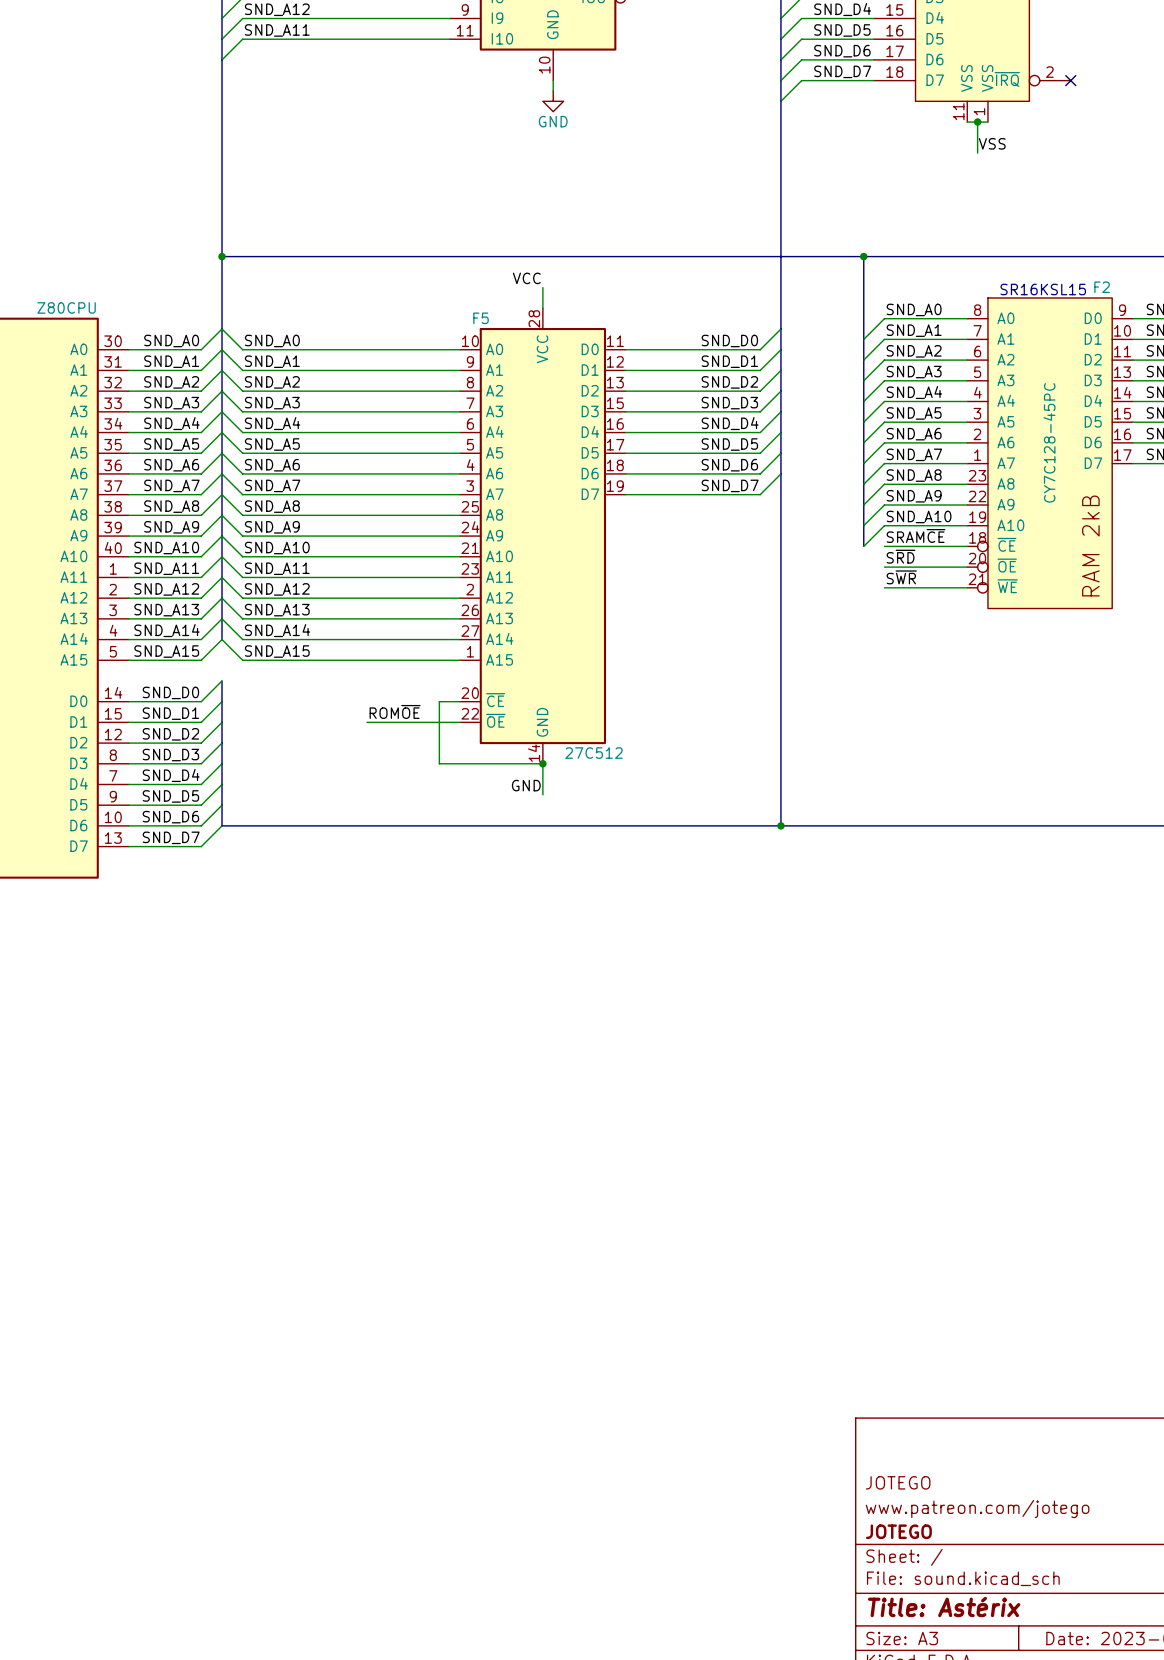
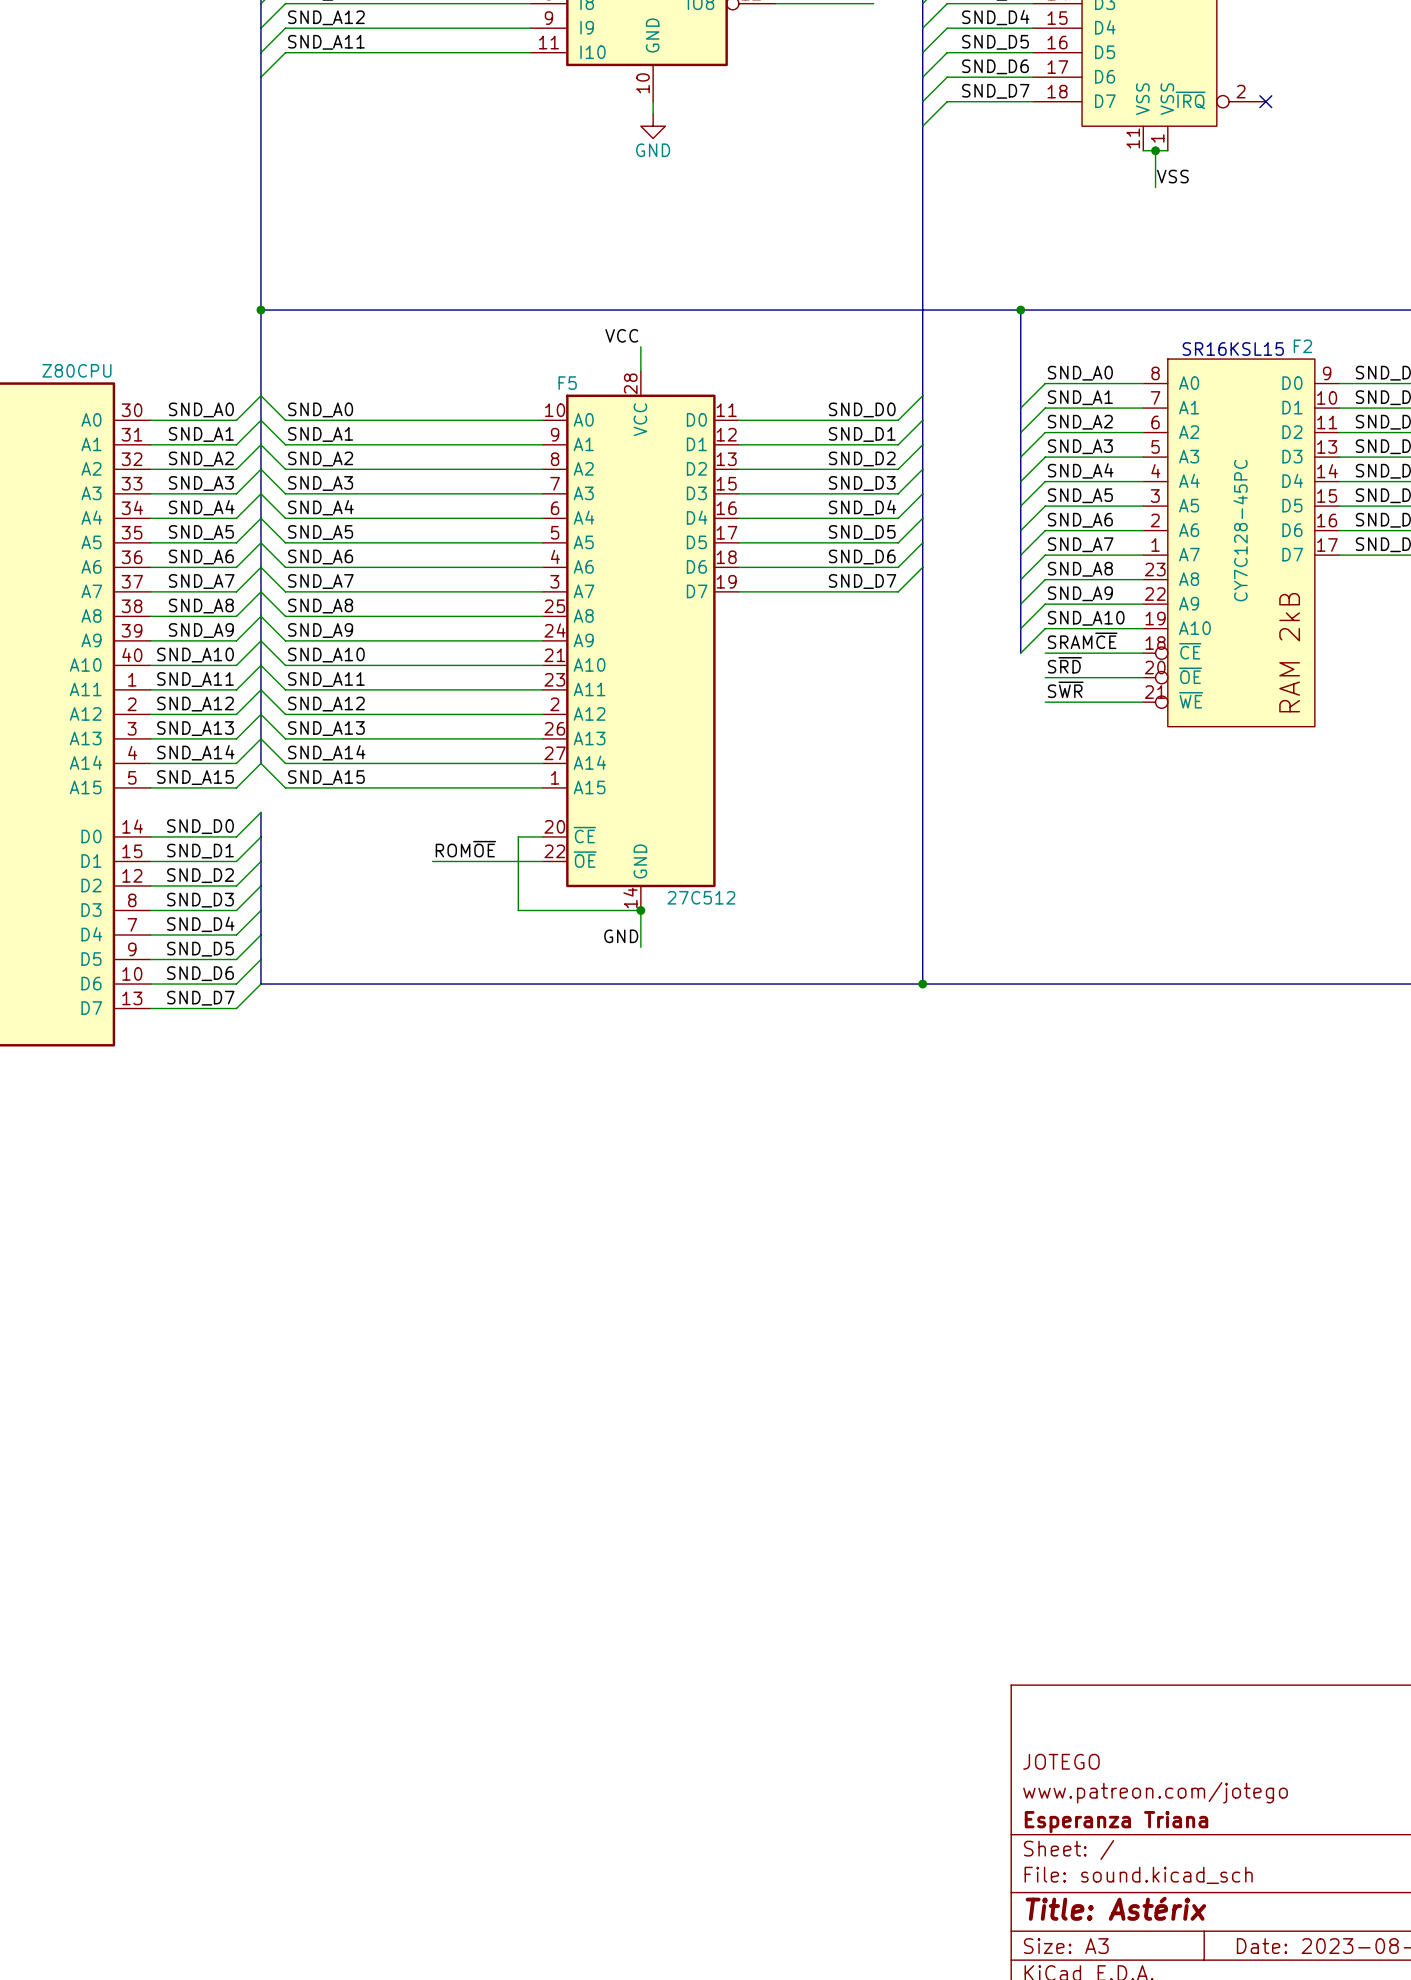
title block: JOTEGO (898, 1531) -> Esperanza Triana (1116, 1822)

